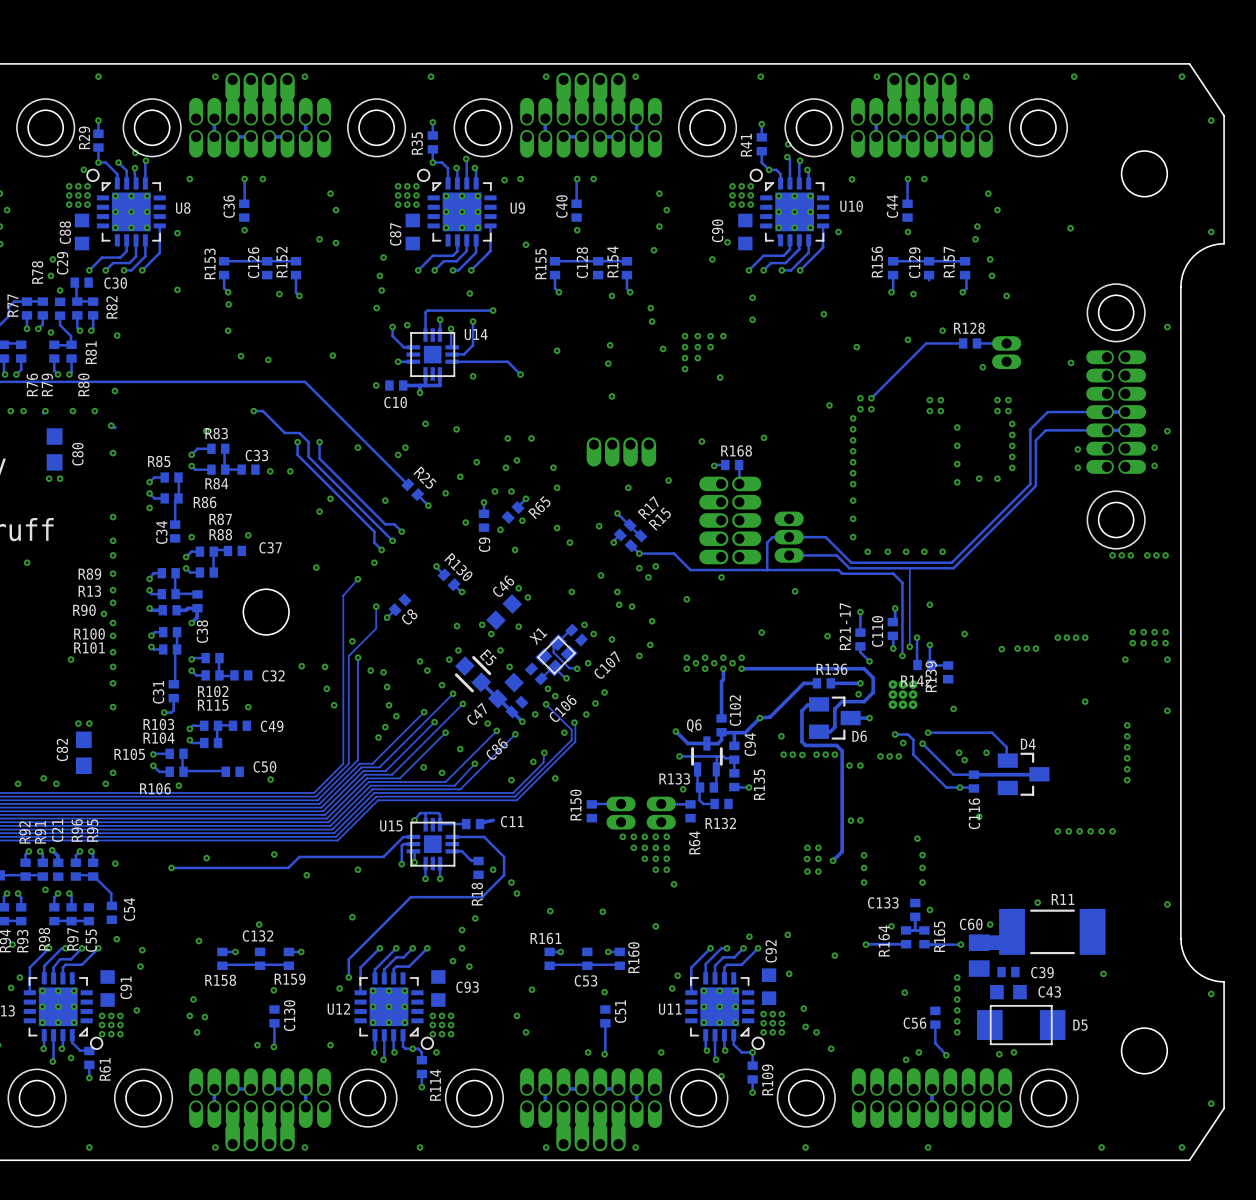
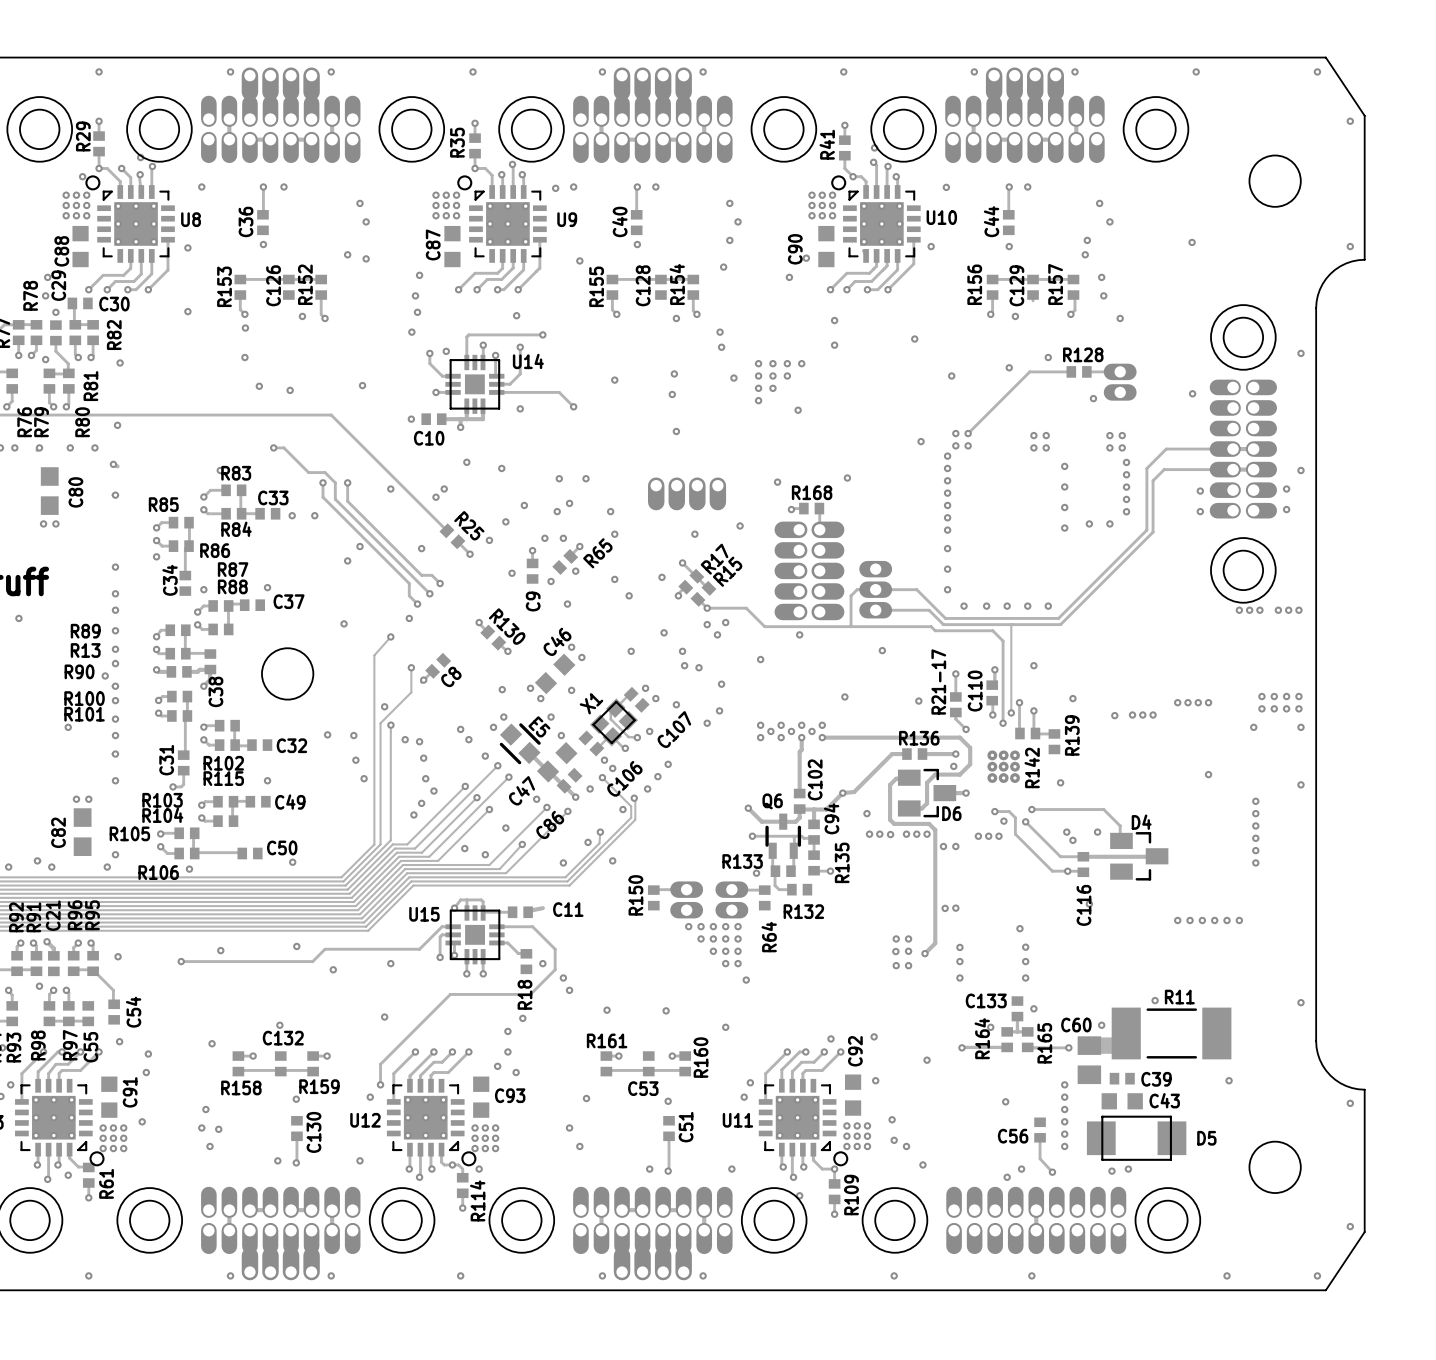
R139 name position: R139 (931, 676) -> R139 (1072, 735)
R142 name rotation: 0° (916, 680) -> 90° counterclockwise (1032, 767)

